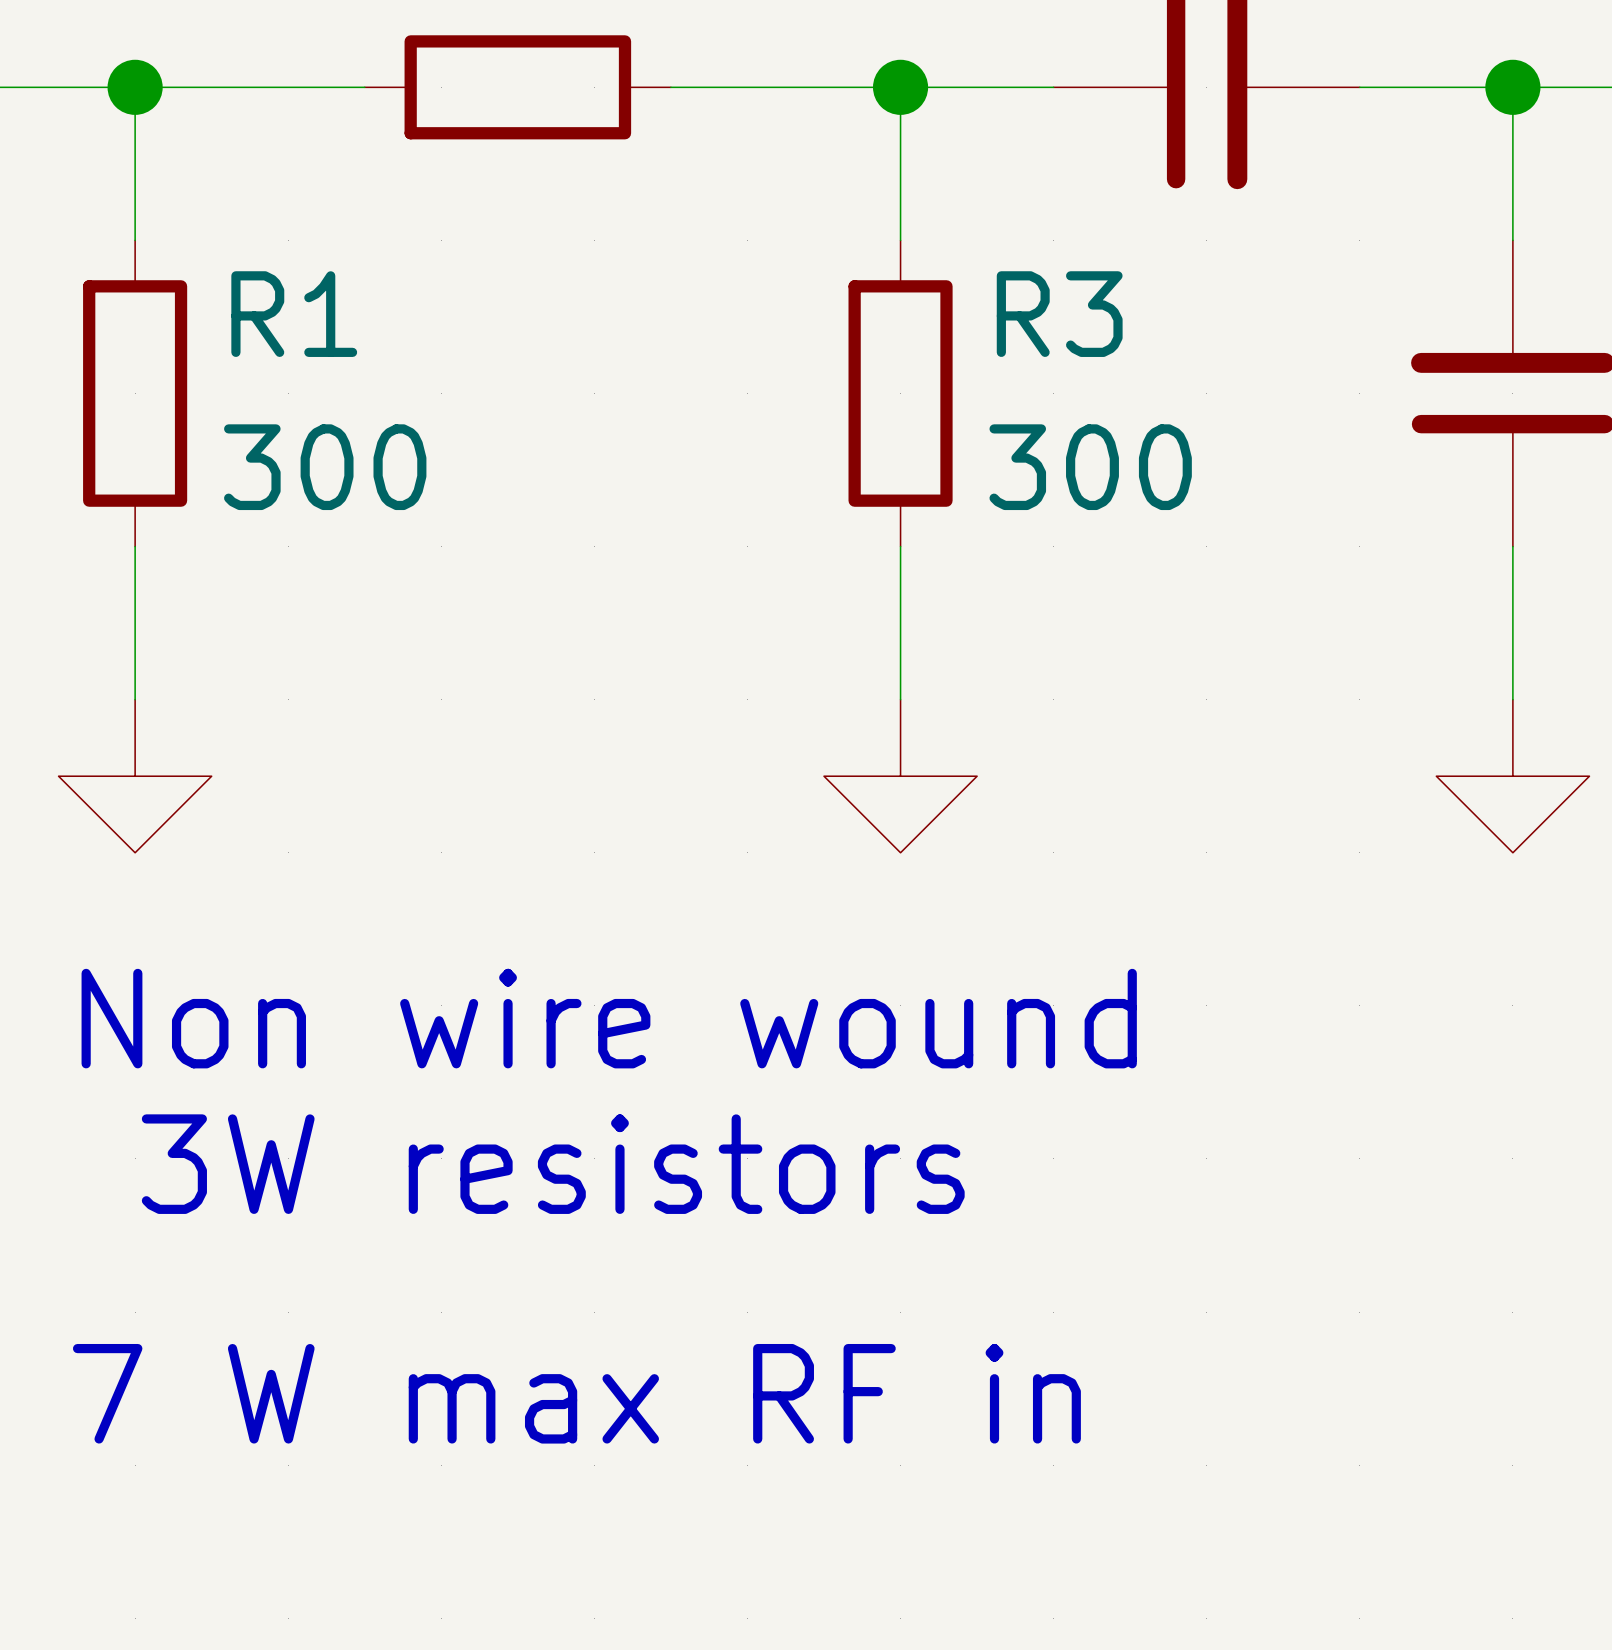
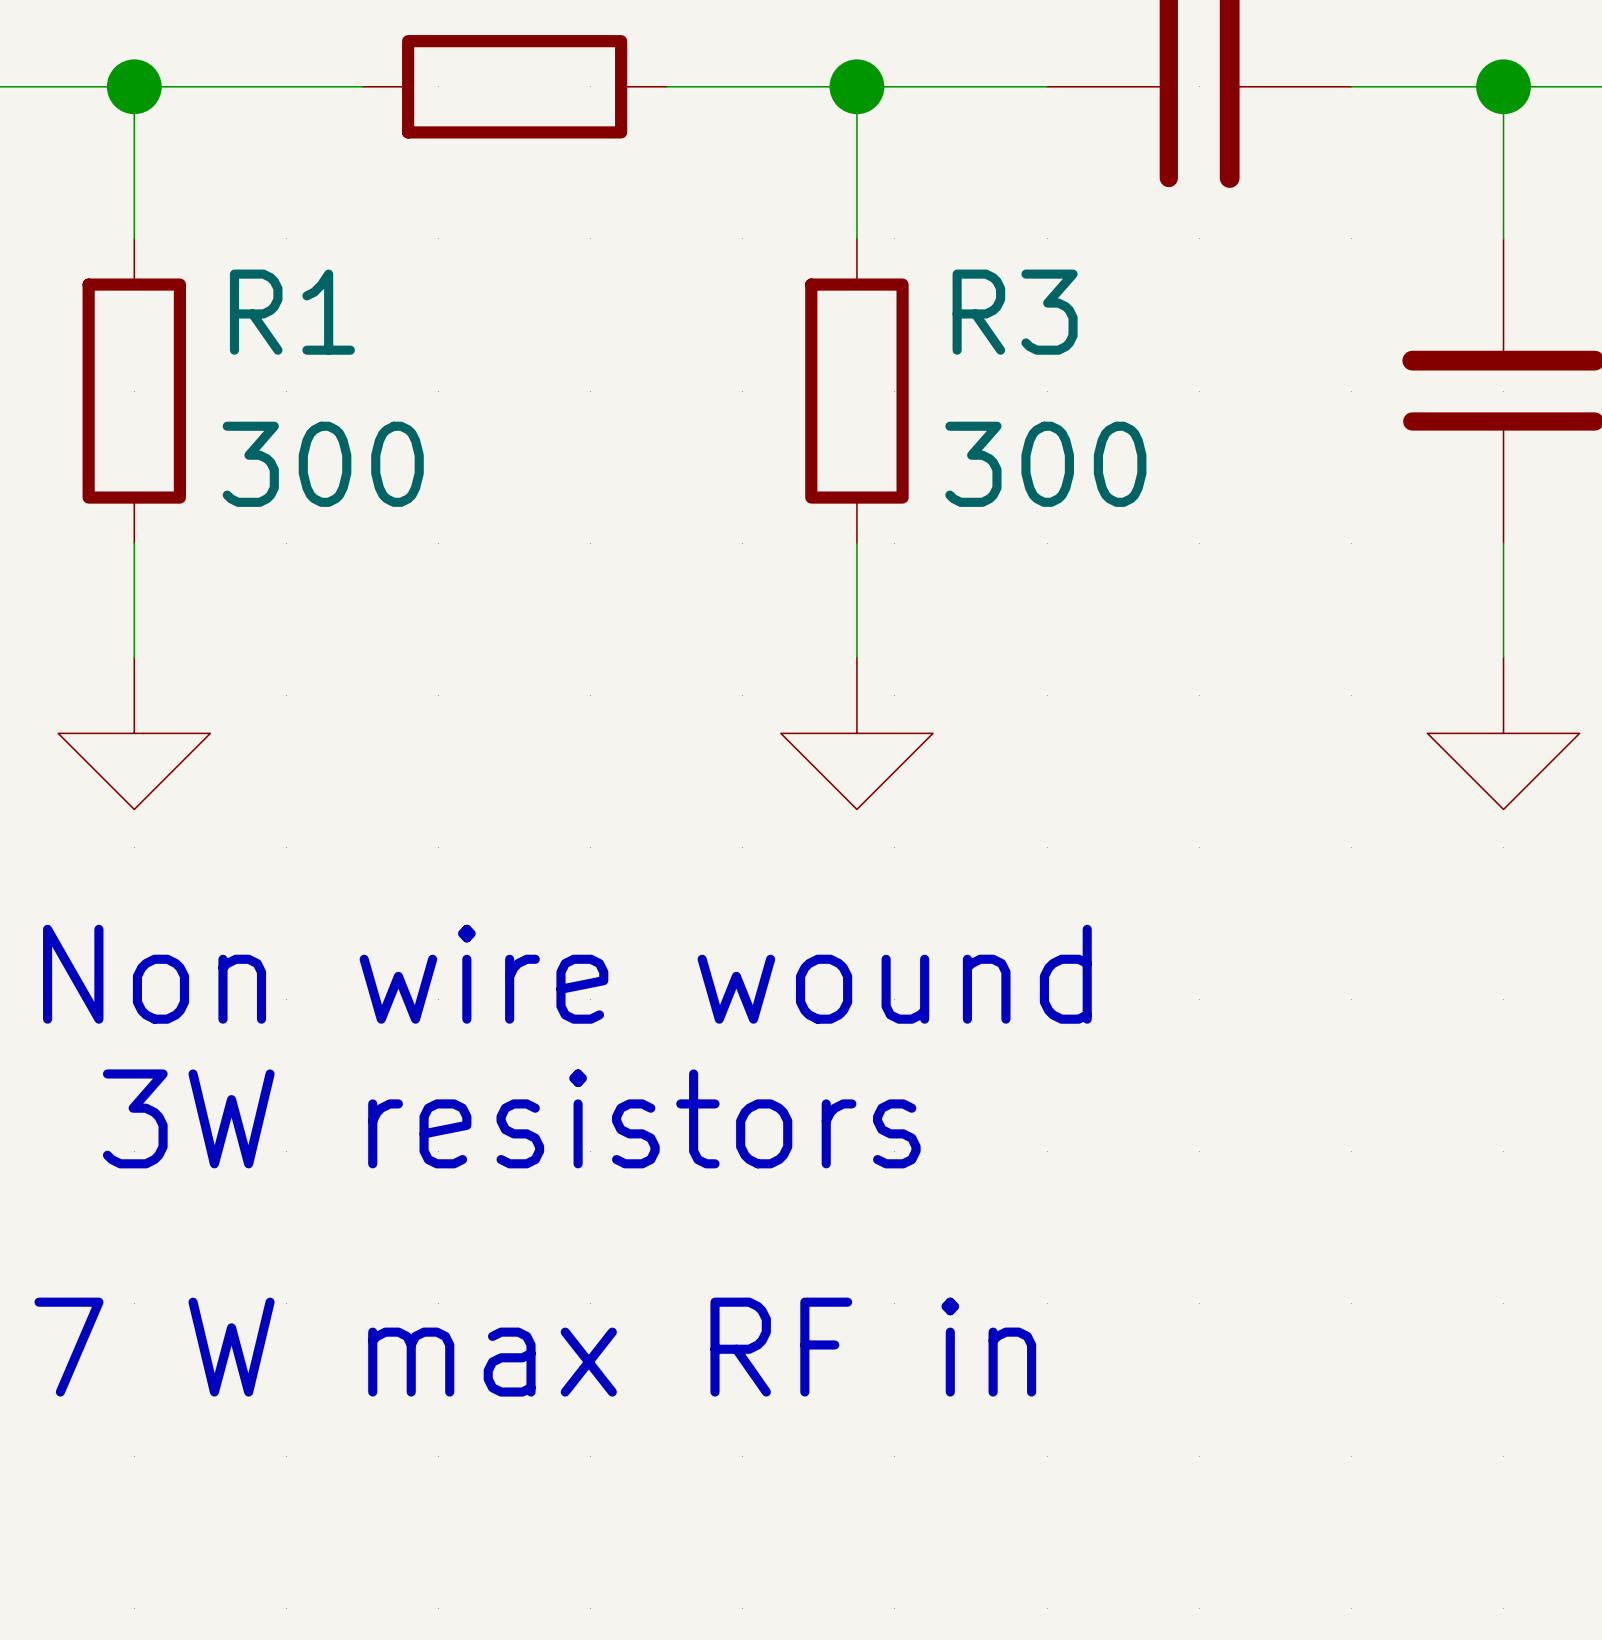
wire: (900, 87) (900, 240) -> (856, 86) (856, 238)
junction position: (900, 87) -> (856, 86)
R3 position: (900, 393) -> (856, 391)
wire: none -> (856, 543) (856, 657)
wire: (900, 546) (900, 699) -> none
power symbol position: (135, 776) -> (134, 733)
power symbol position: (900, 776) -> (856, 733)
power symbol position: (1512, 776) -> (1503, 733)
text position: Non wire wound (609, 1018) -> Non wire wound (567, 974)
text position: 3W resistors (553, 1164) -> 3W resistors (511, 1118)
text position: 7 W max RF in (576, 1393) -> 7 W max RF in (535, 1347)

